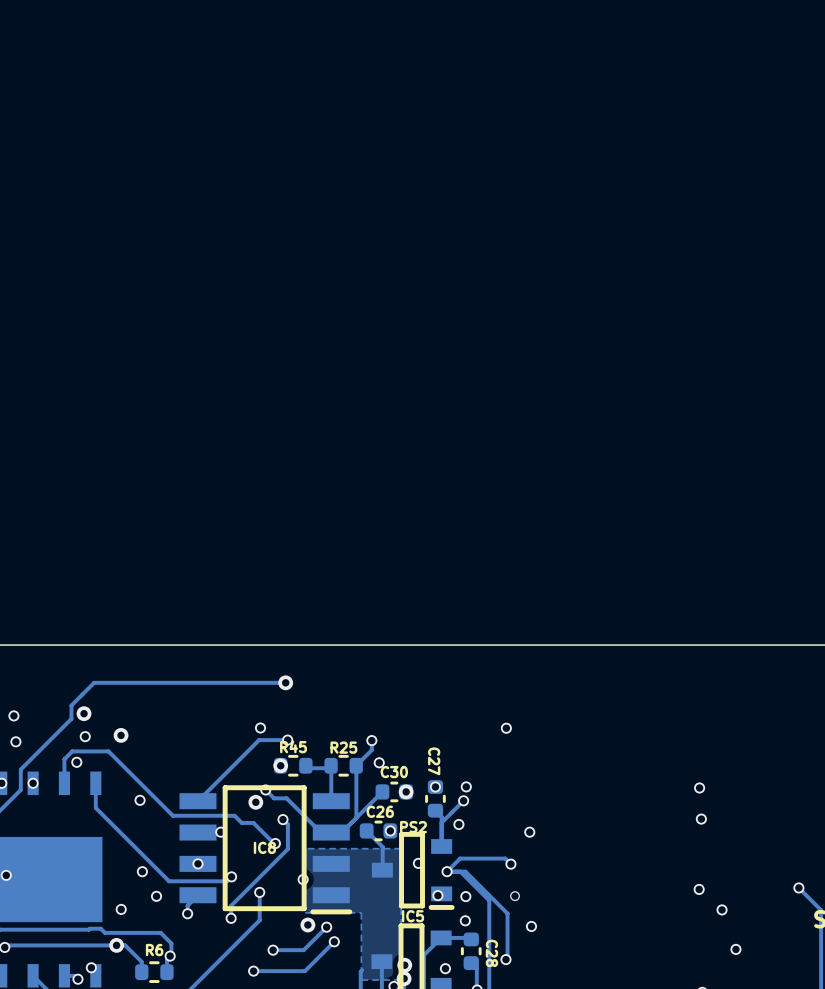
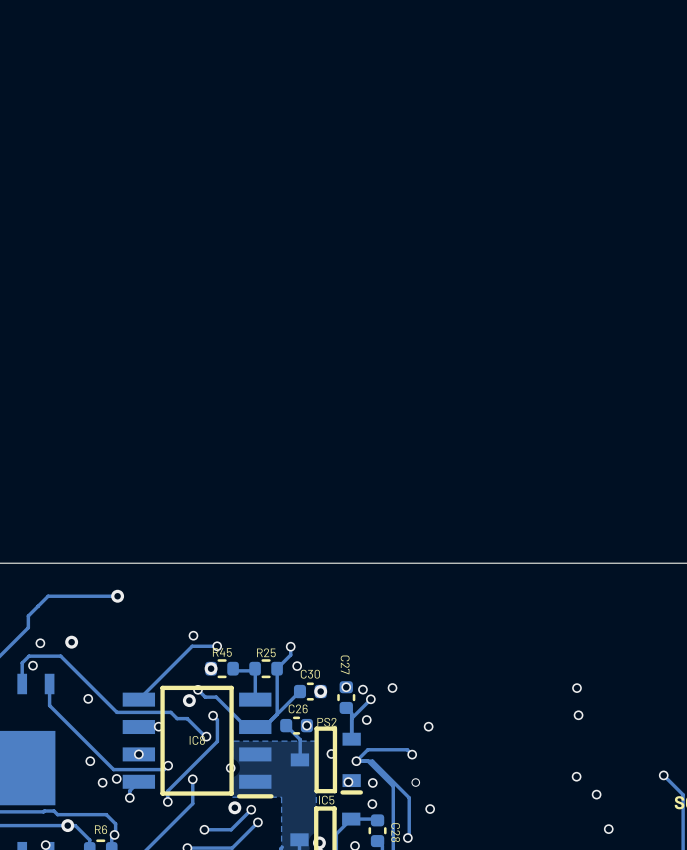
via: none -> (117, 596)
track: (285, 682) (173, 682) -> none
via: (285, 682) -> none
via: (84, 713) -> none
via: (506, 728) -> none
via: (466, 786) -> none
via: none -> (392, 688)
via: none -> (362, 689)
via position: (121, 909) -> (116, 778)

